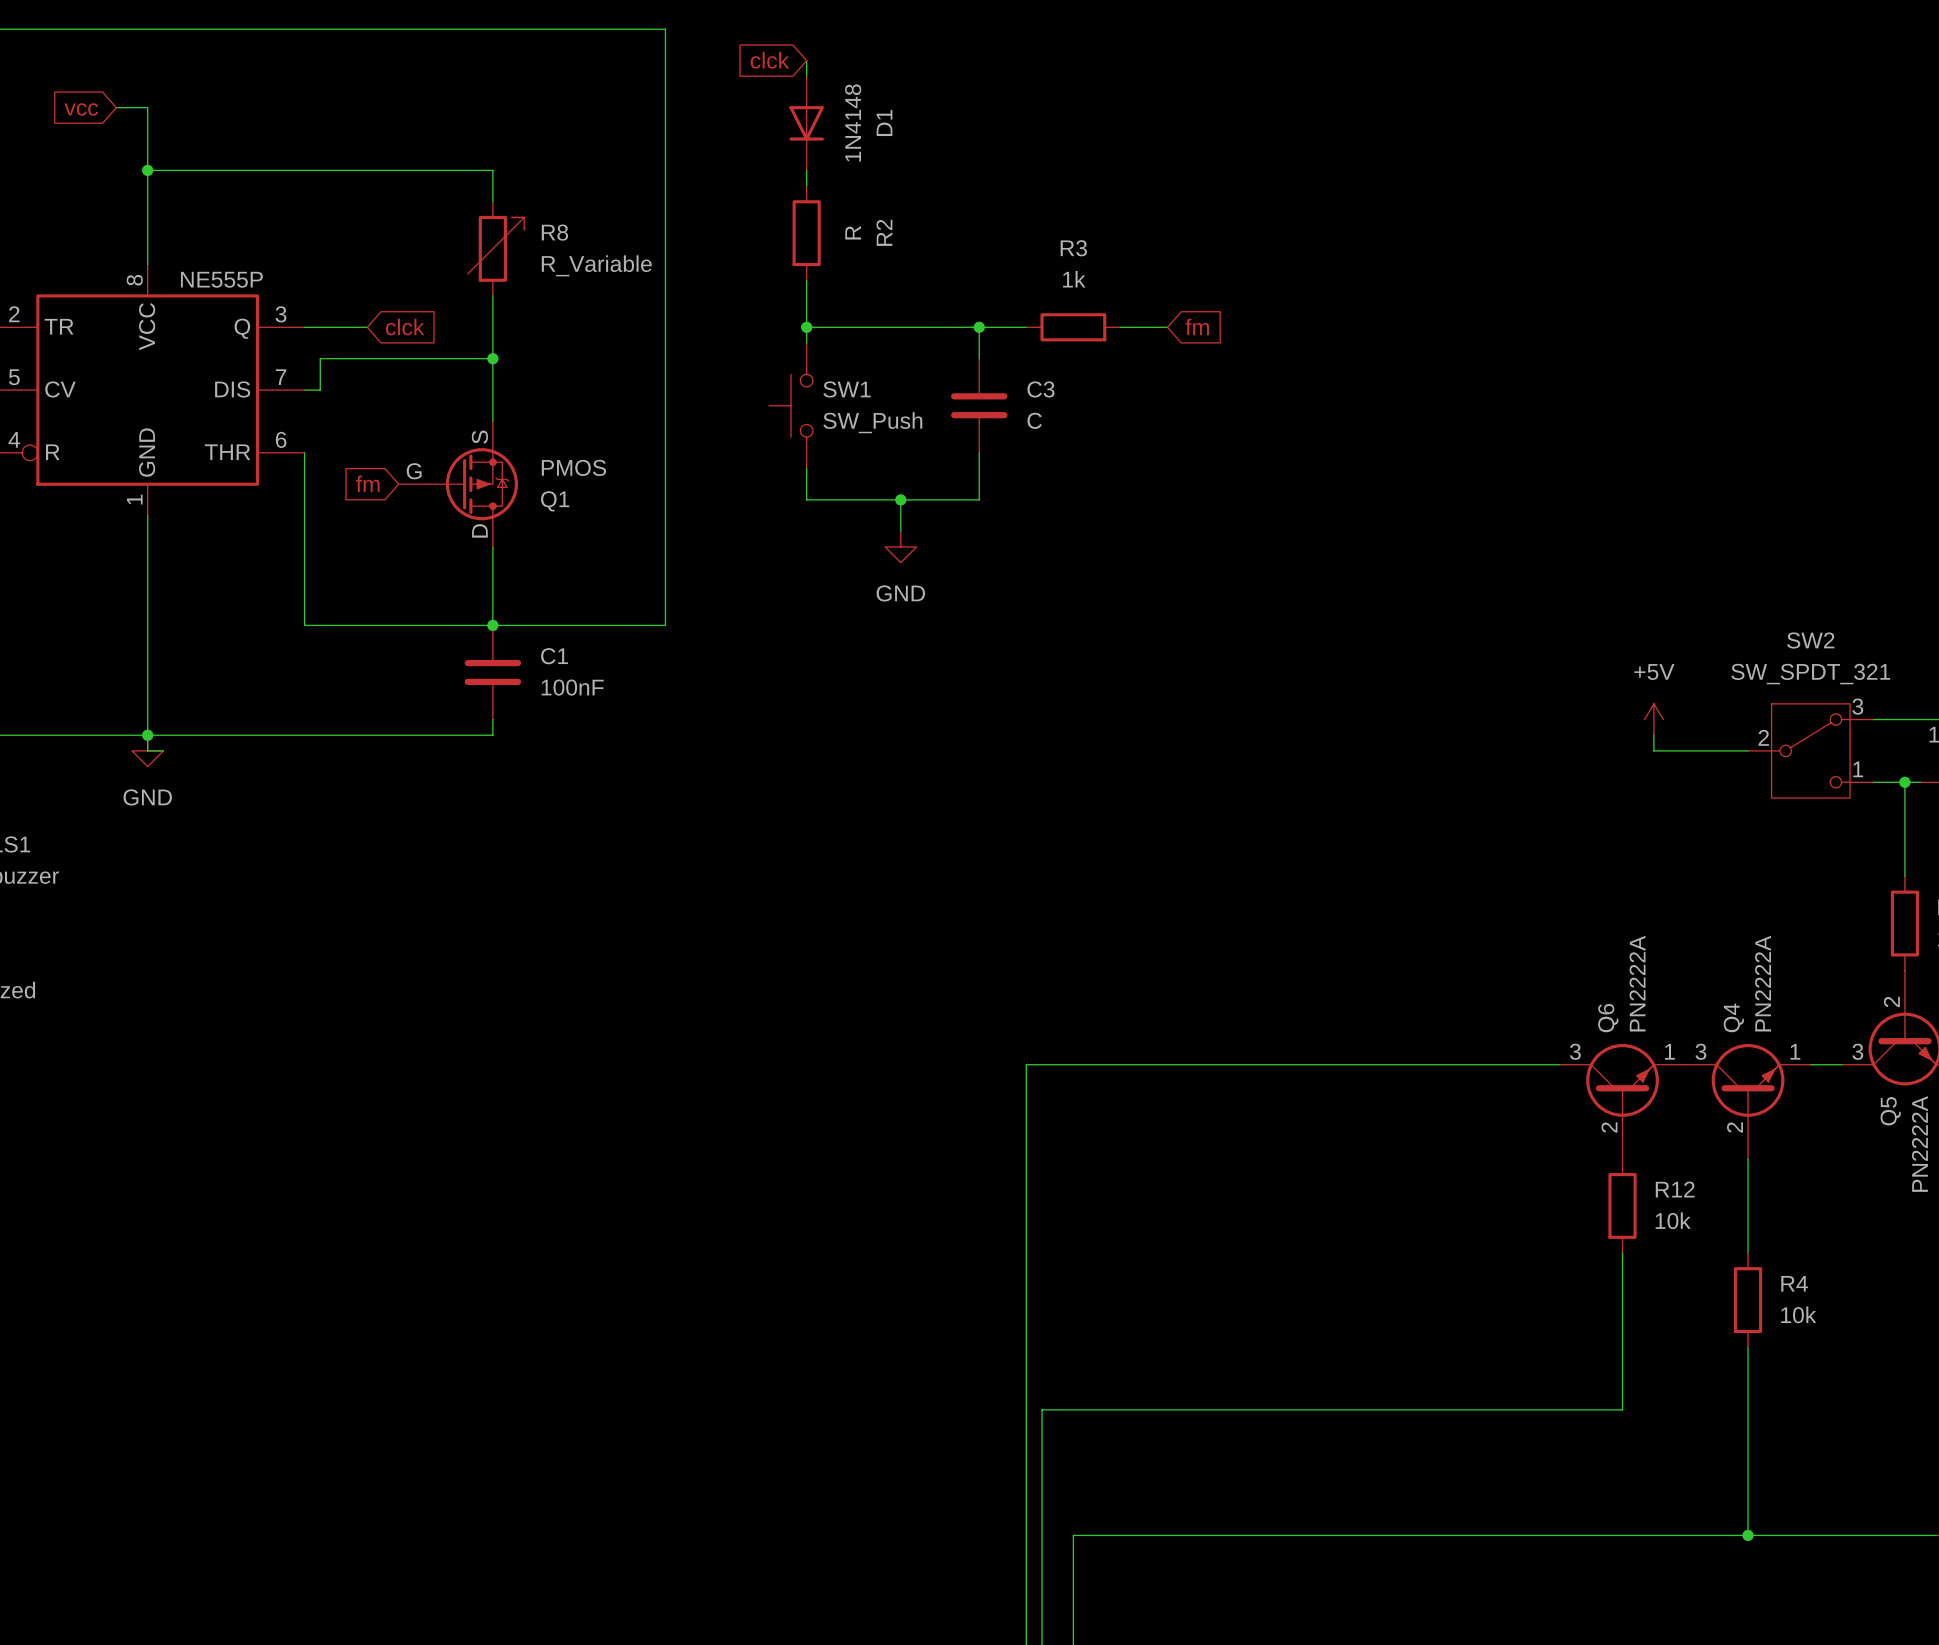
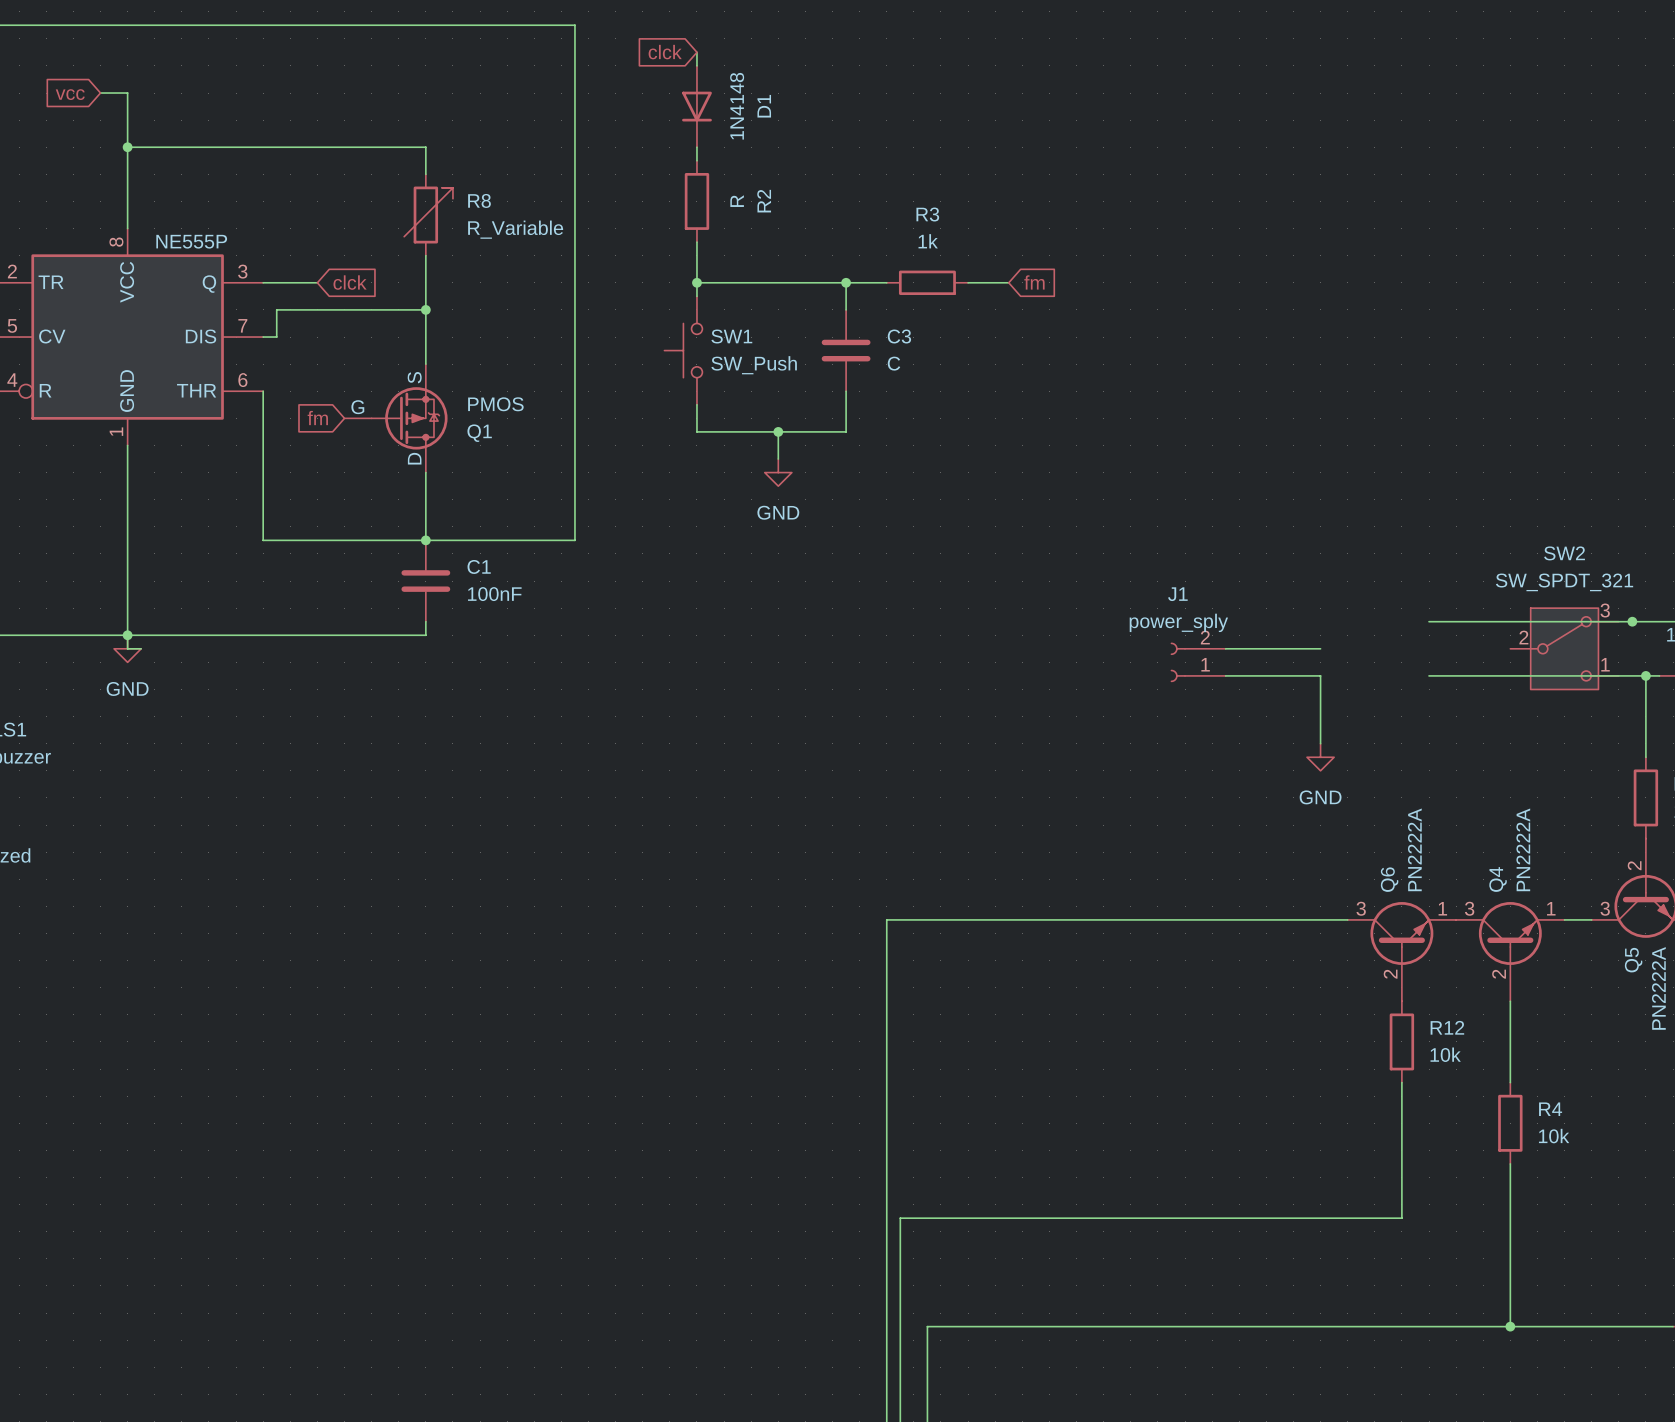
wire: none -> (1429, 621) (1618, 621)
power symbol: +5V (1653, 719) -> none
junction: none -> (1632, 621)
wire: (1653, 735) (1653, 750) (1748, 750) -> none
wire: none -> (1225, 648) (1320, 648)
J1: none -> power_sply (1198, 662)
wire: none -> (1225, 675) (1320, 675) (1320, 743)
wire: none -> (1429, 675) (1618, 675)
power symbol: none -> GND (1320, 757)

